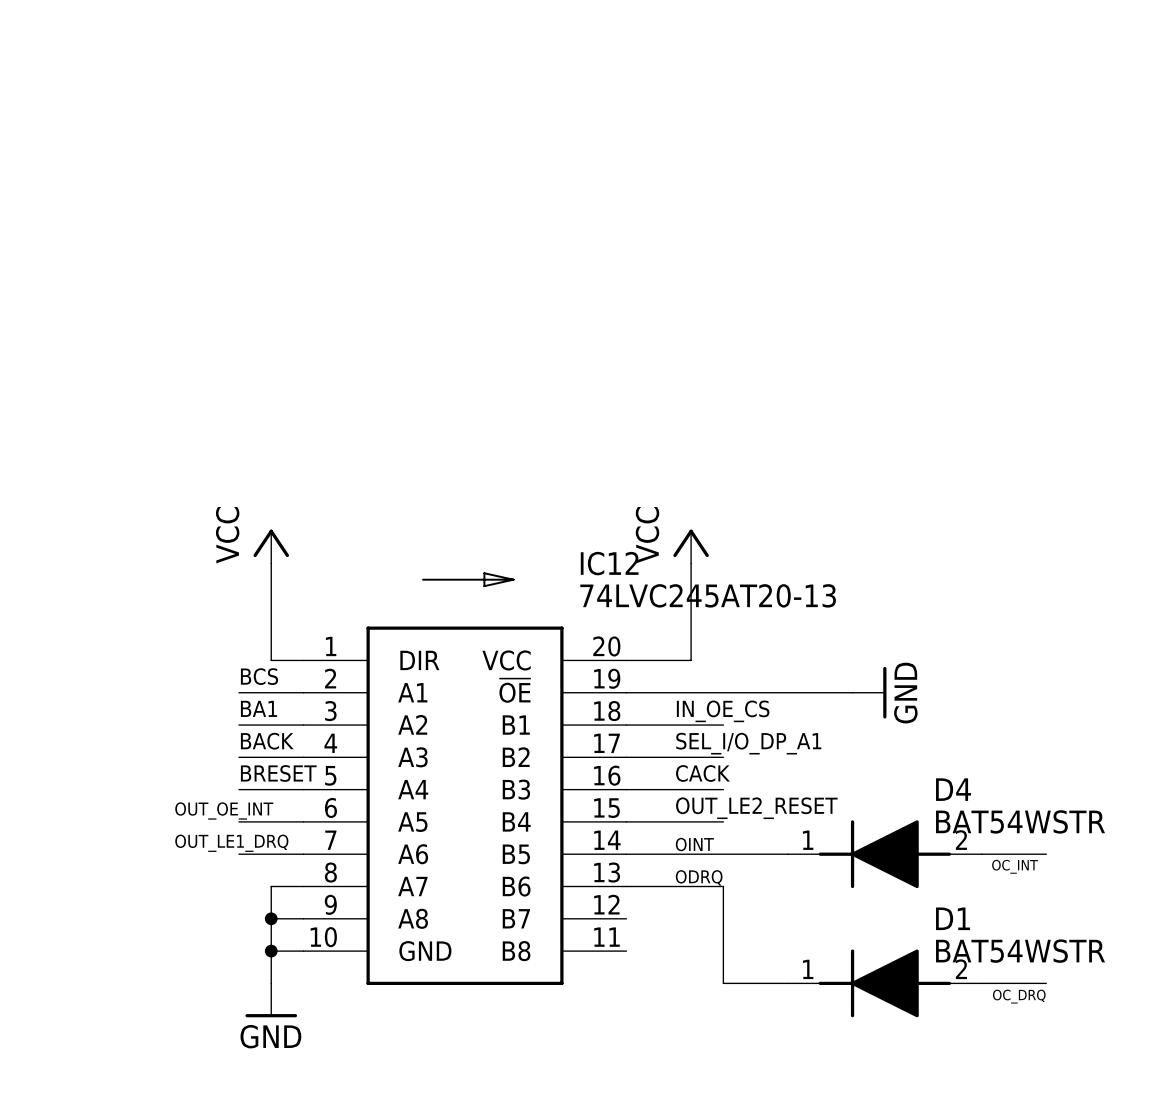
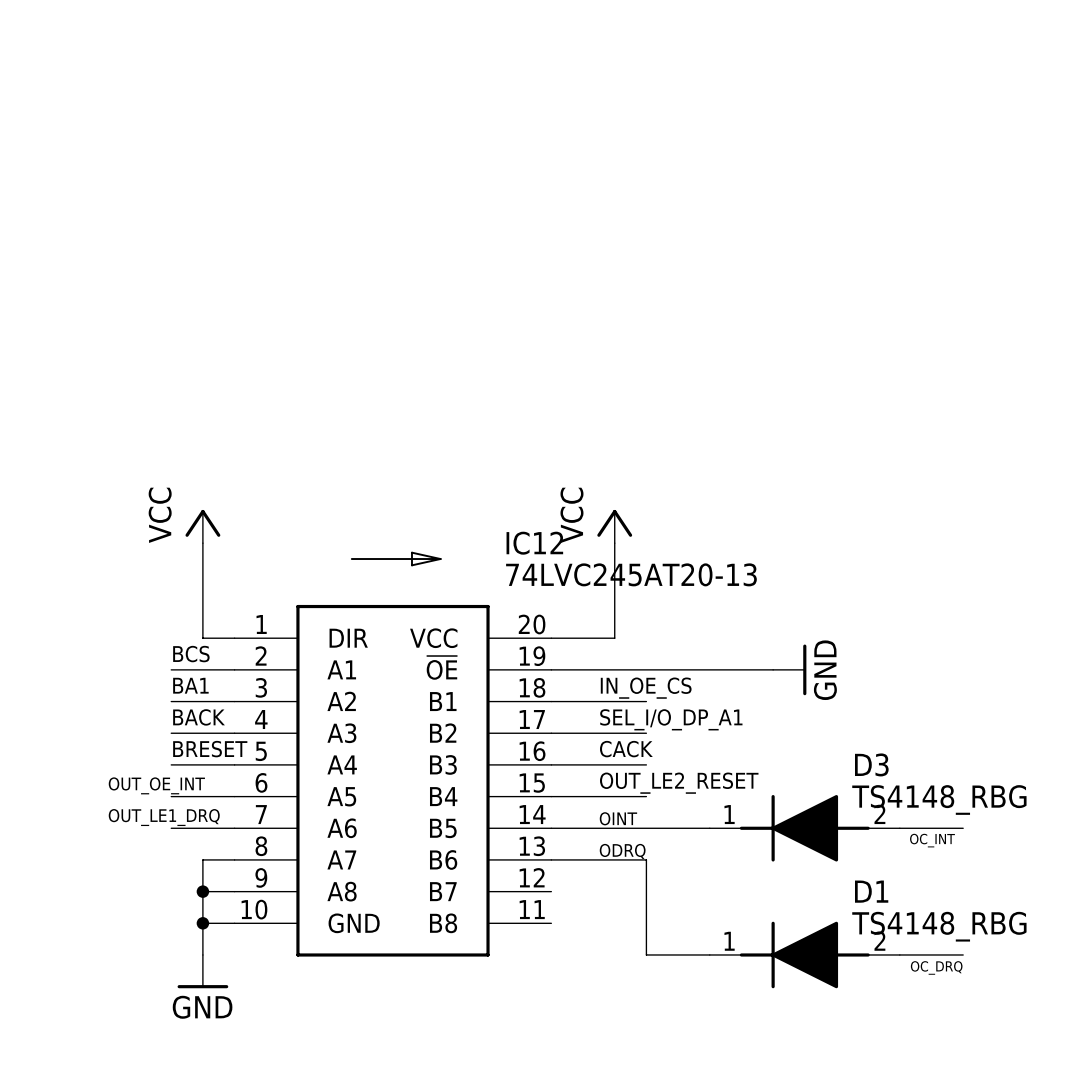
D4 name: D4 (953, 789) -> D3 (871, 764)
D4 value: BAT54WSTR (1020, 821) -> TS4148_RBG (939, 799)
D1 value: BAT54WSTR (1020, 951) -> TS4148_RBG (939, 926)

